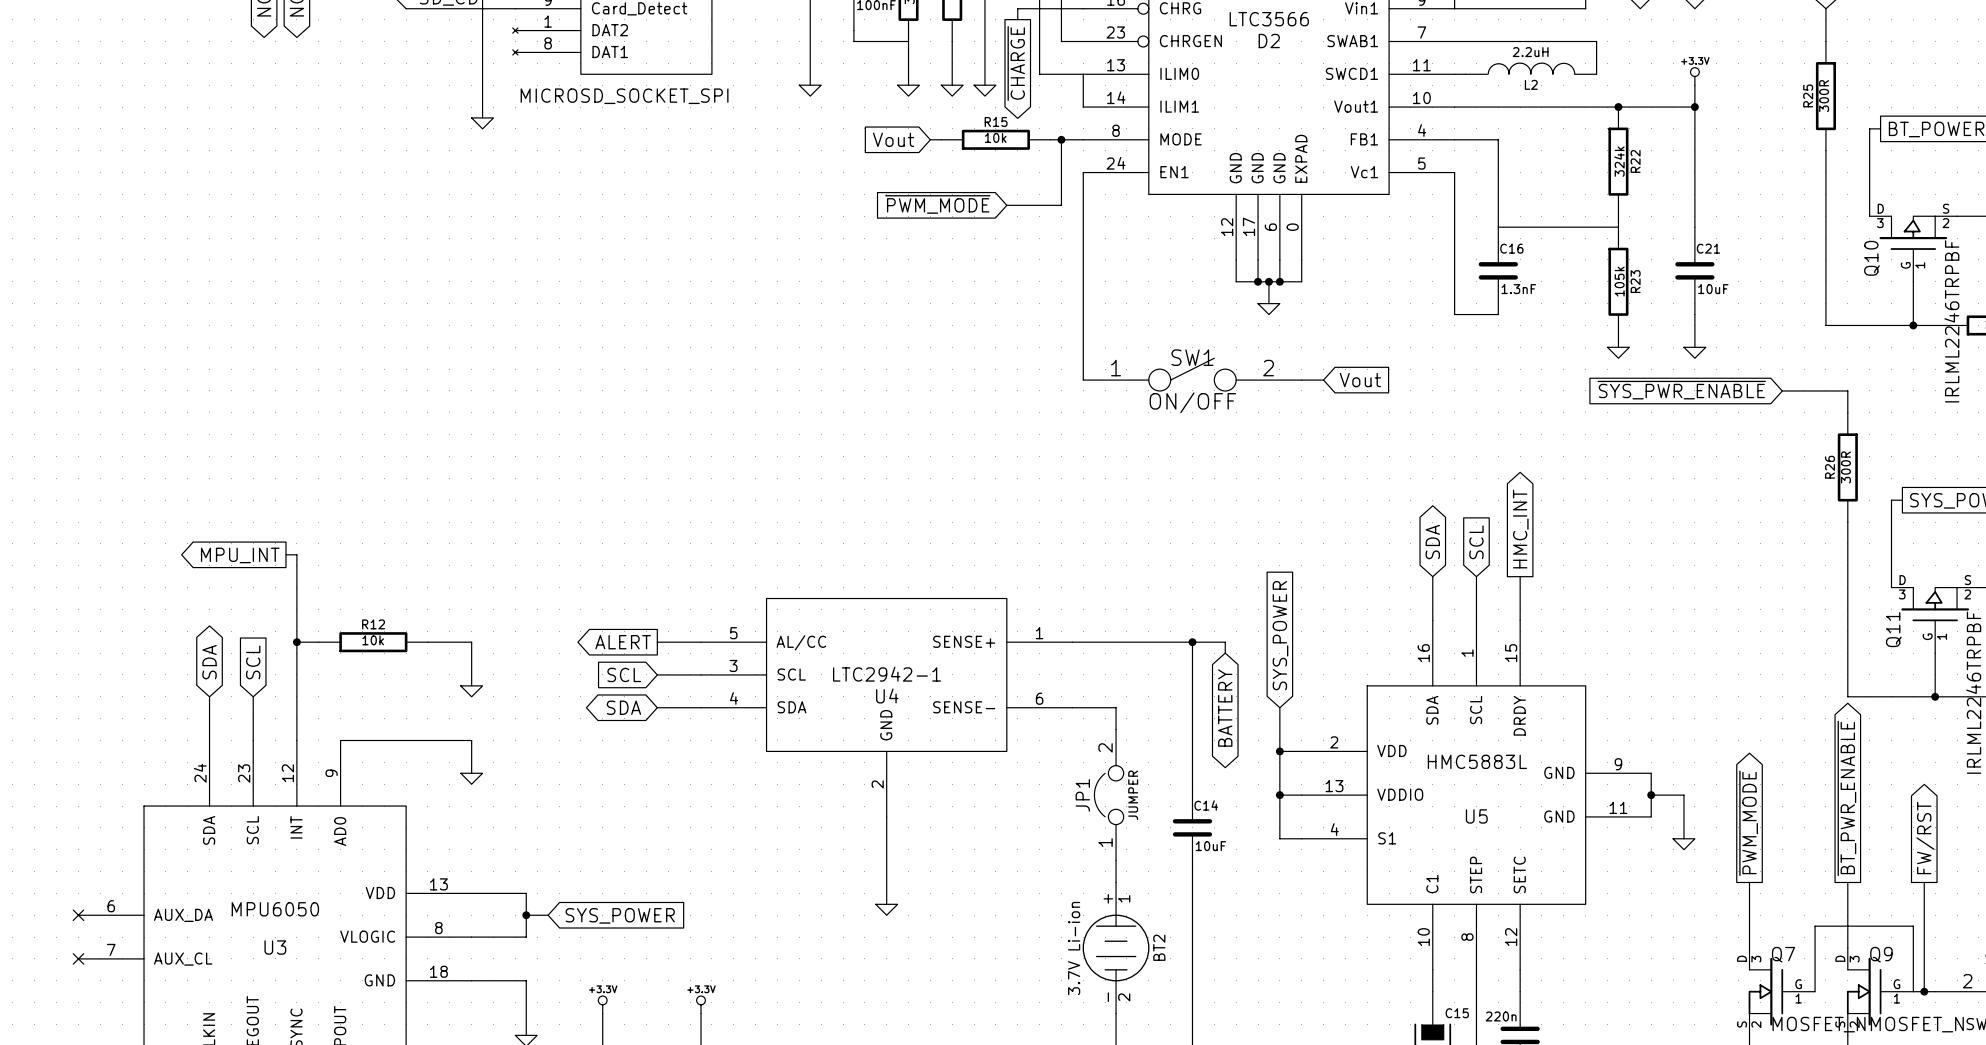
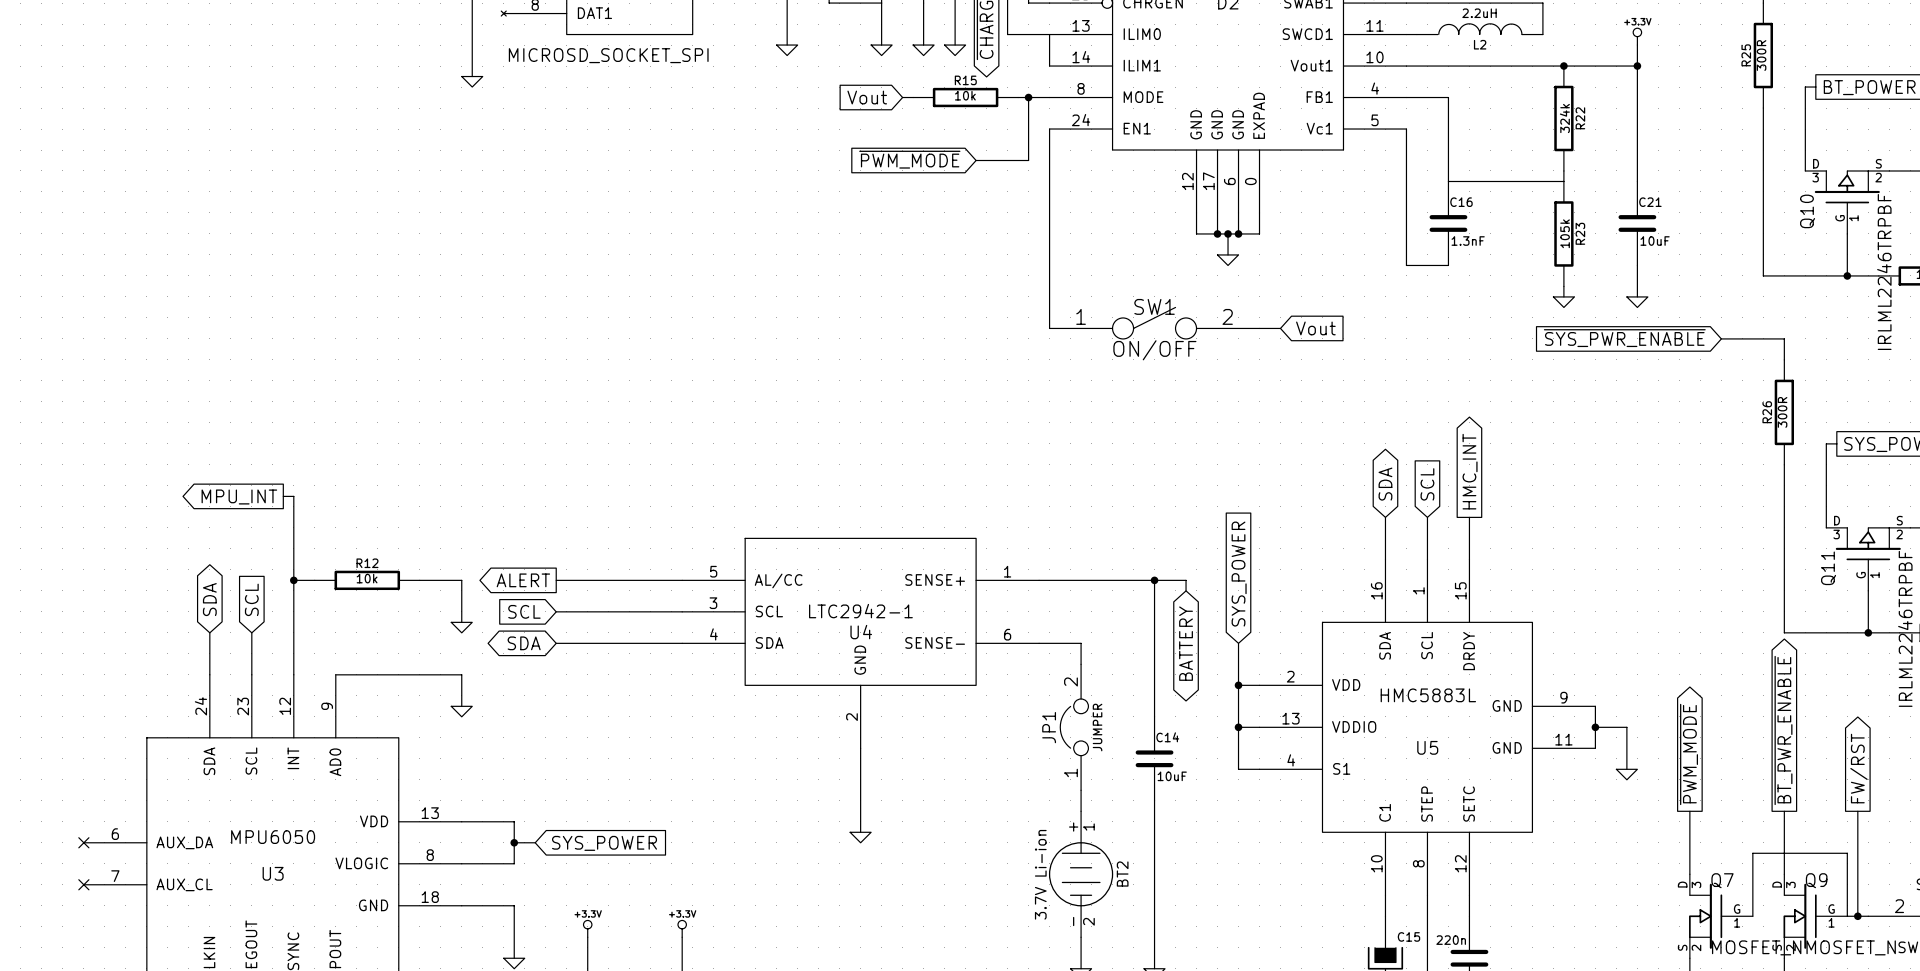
wire: none -> (556, 580) (640, 580)
global label position: ALERT (623, 642) -> ALERT (523, 580)
wire: none -> (556, 611) (640, 611)
global label position: SCL (624, 674) -> SCL (524, 611)
wire: none -> (556, 643) (640, 643)
global label position: SDA (623, 707) -> SDA (524, 643)

